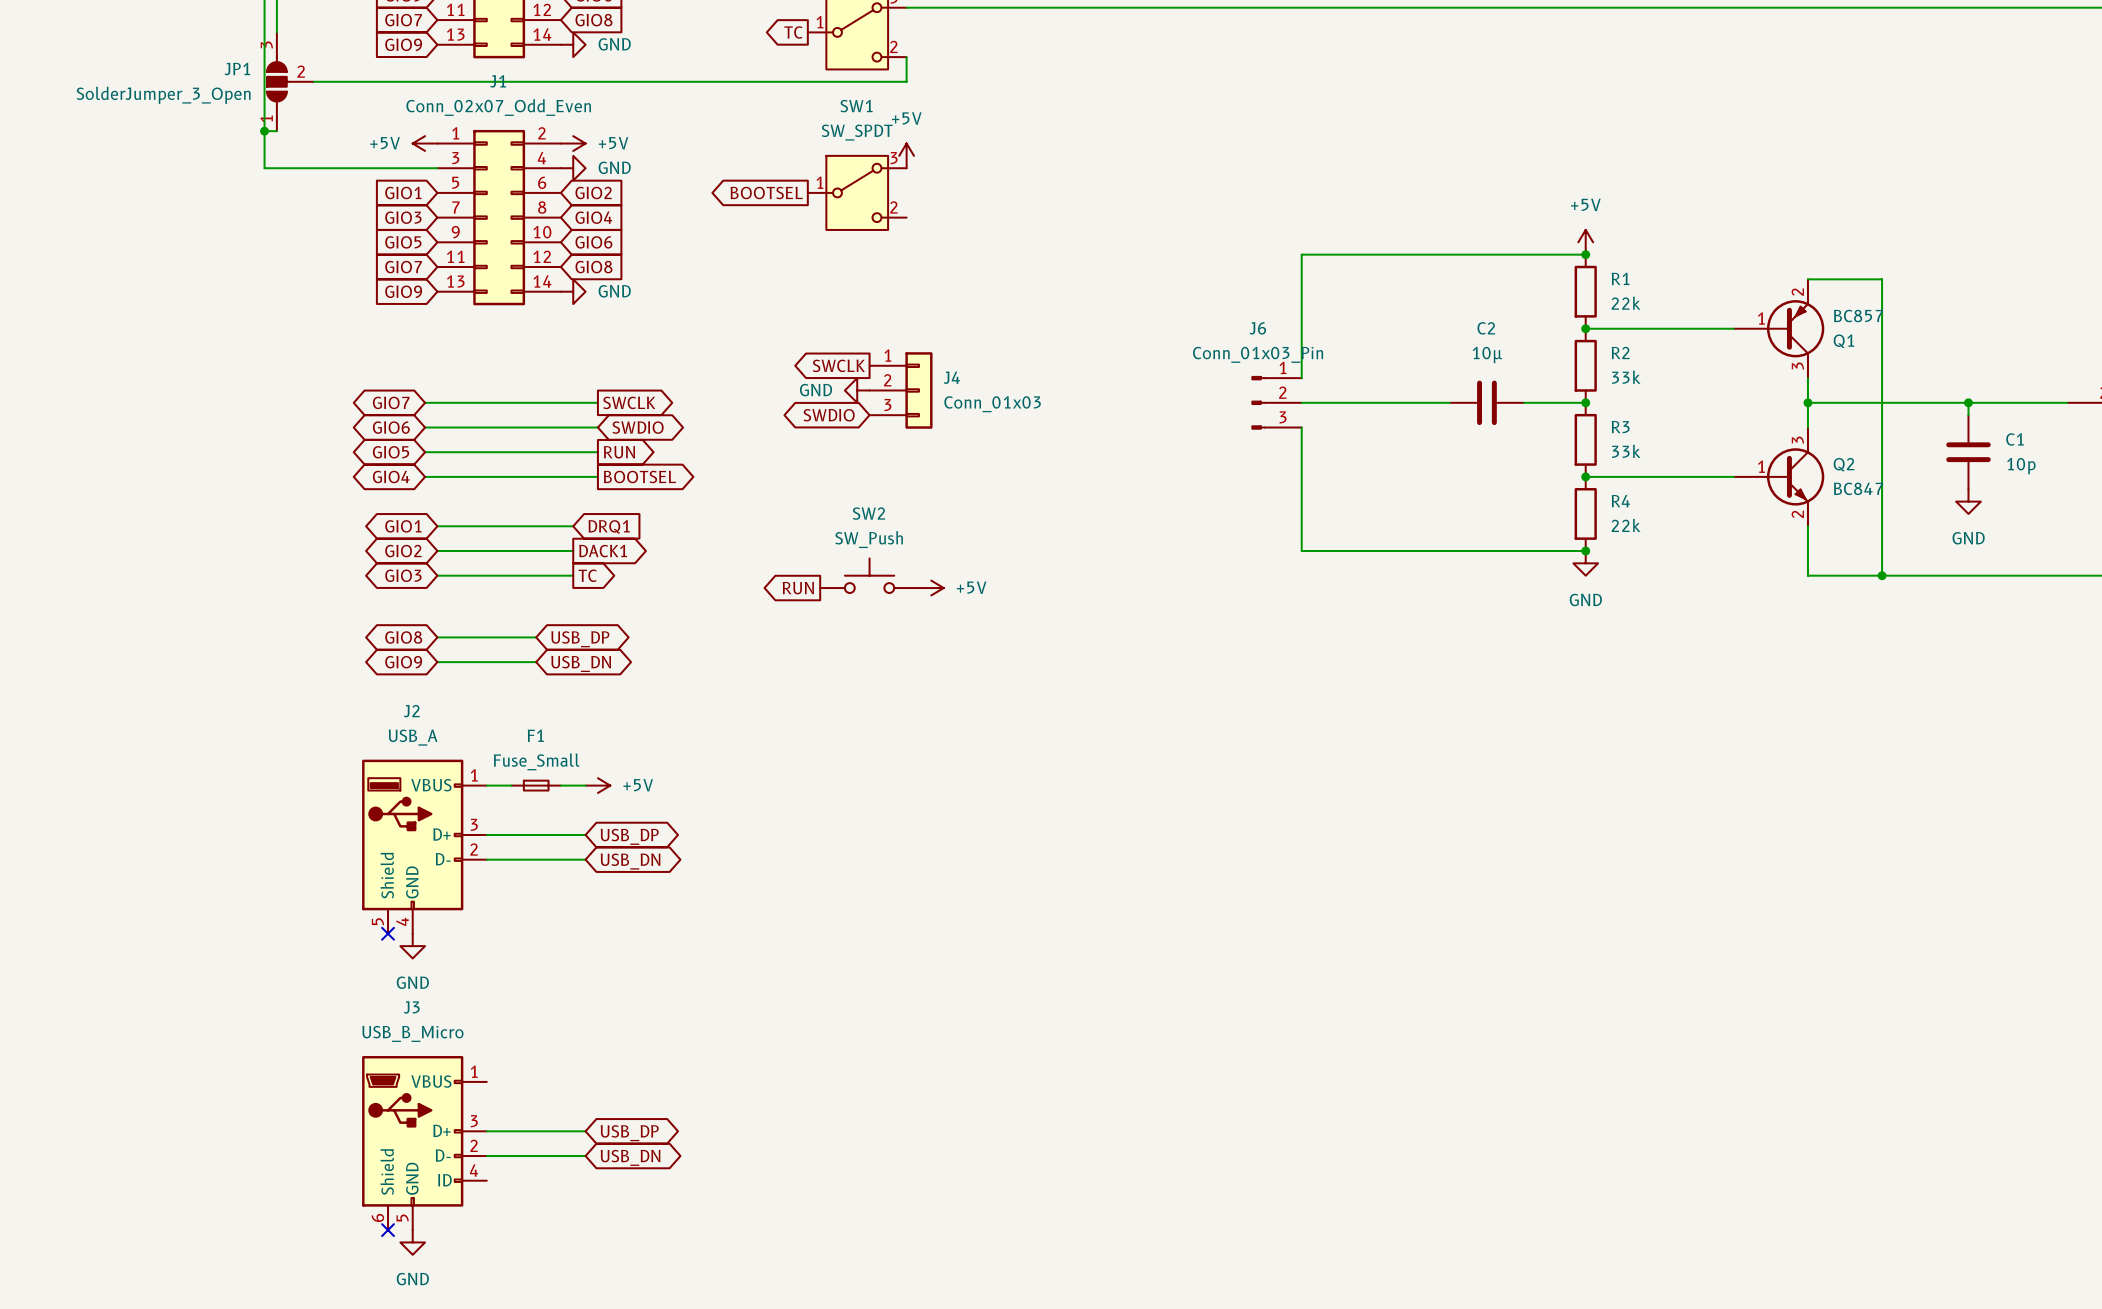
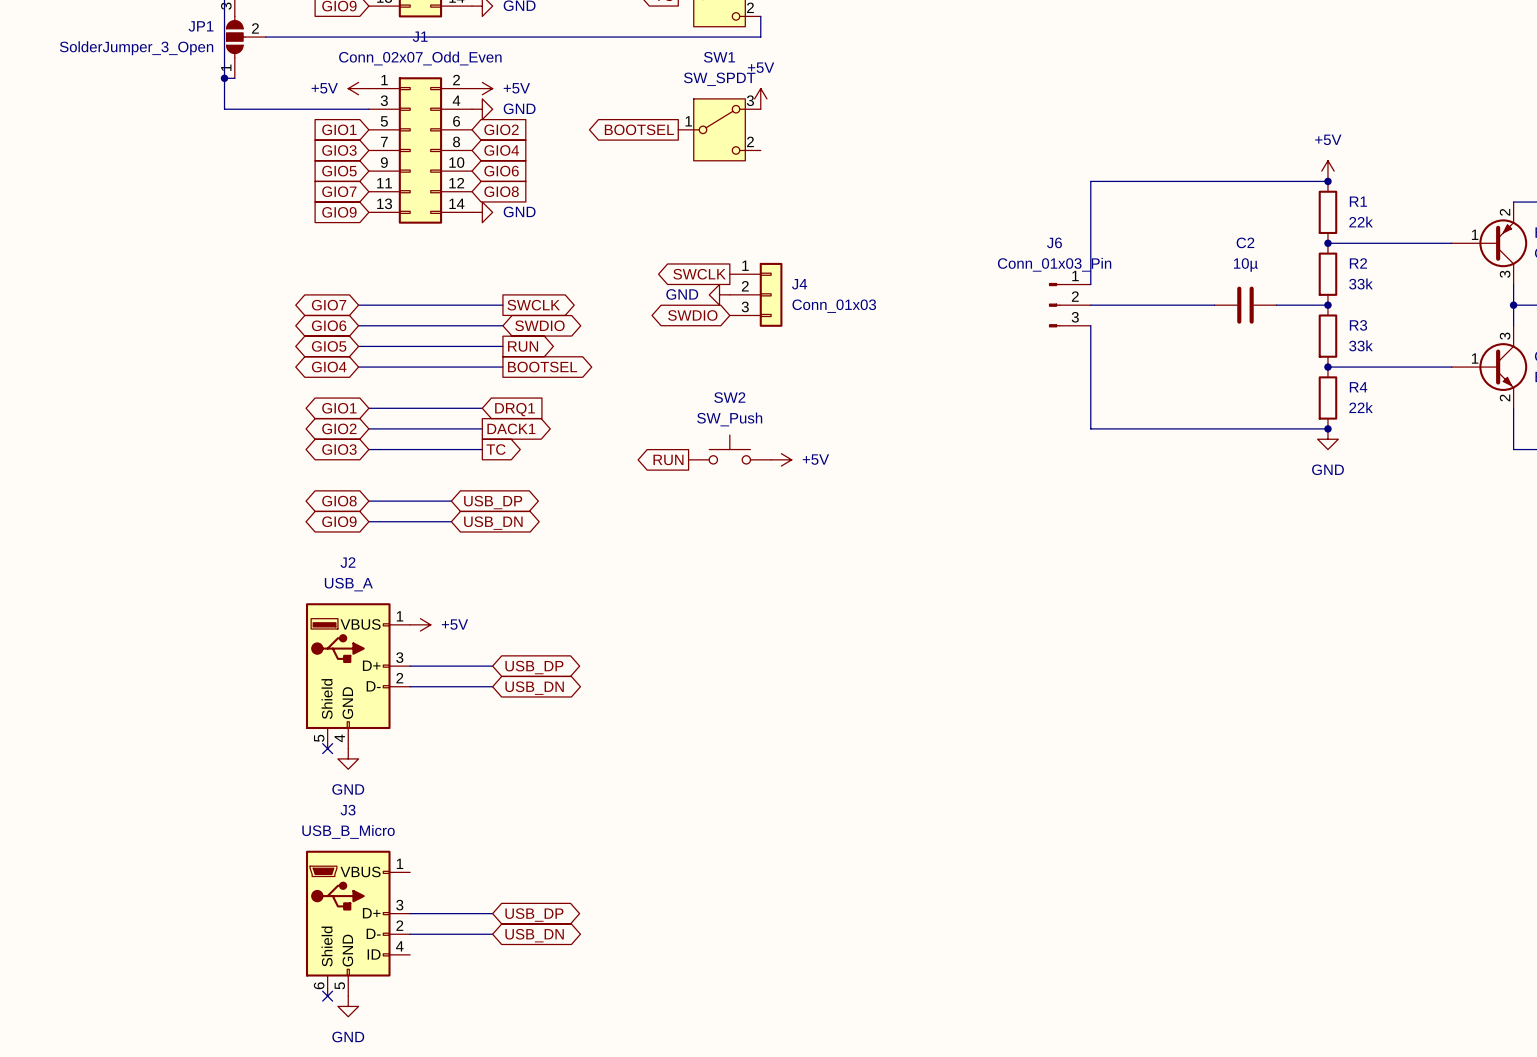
F1: Fuse_Small (536, 785) -> none
wire: (560, 785) (585, 785) -> none
power symbol position: +5V (597, 785) -> +5V (420, 624)

